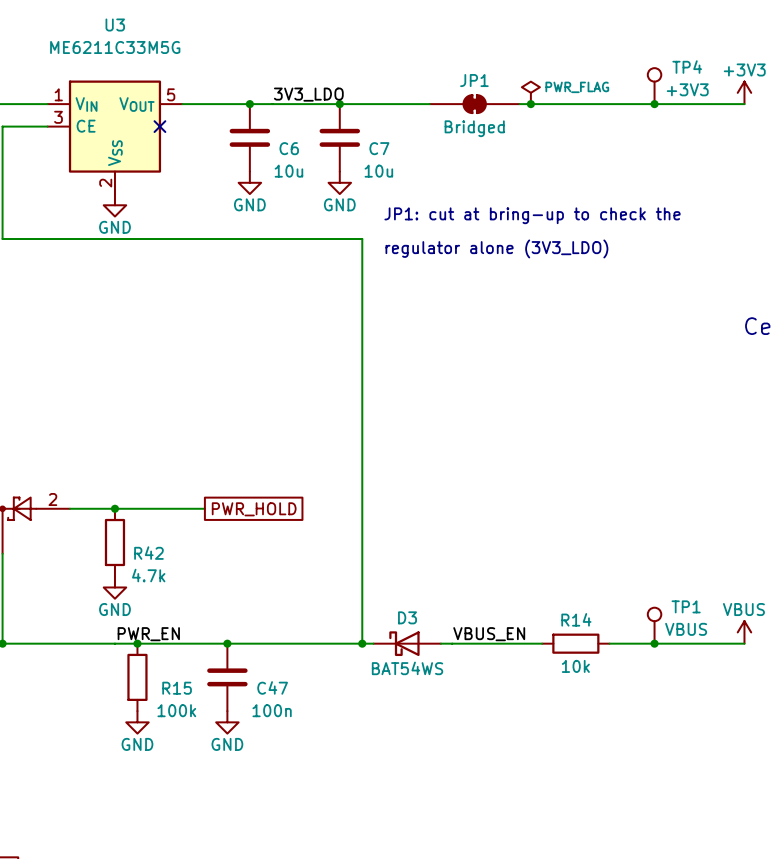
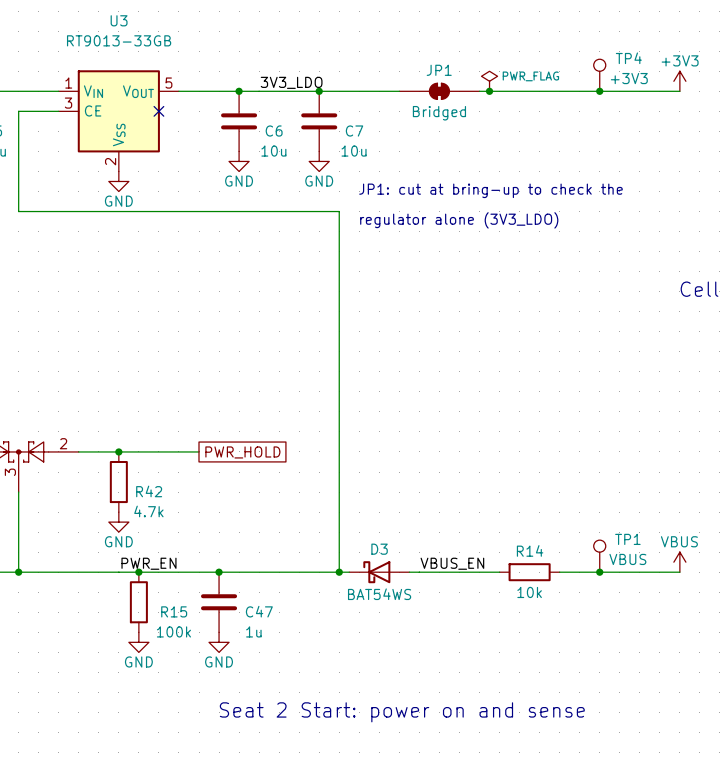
U3 value: ME6211C33M5G (115, 47) -> RT9013-33GB (119, 40)
C47 value: 100n (272, 710) -> 1u (253, 631)
text: none -> Seat 2 Start: power on and sense (402, 712)

